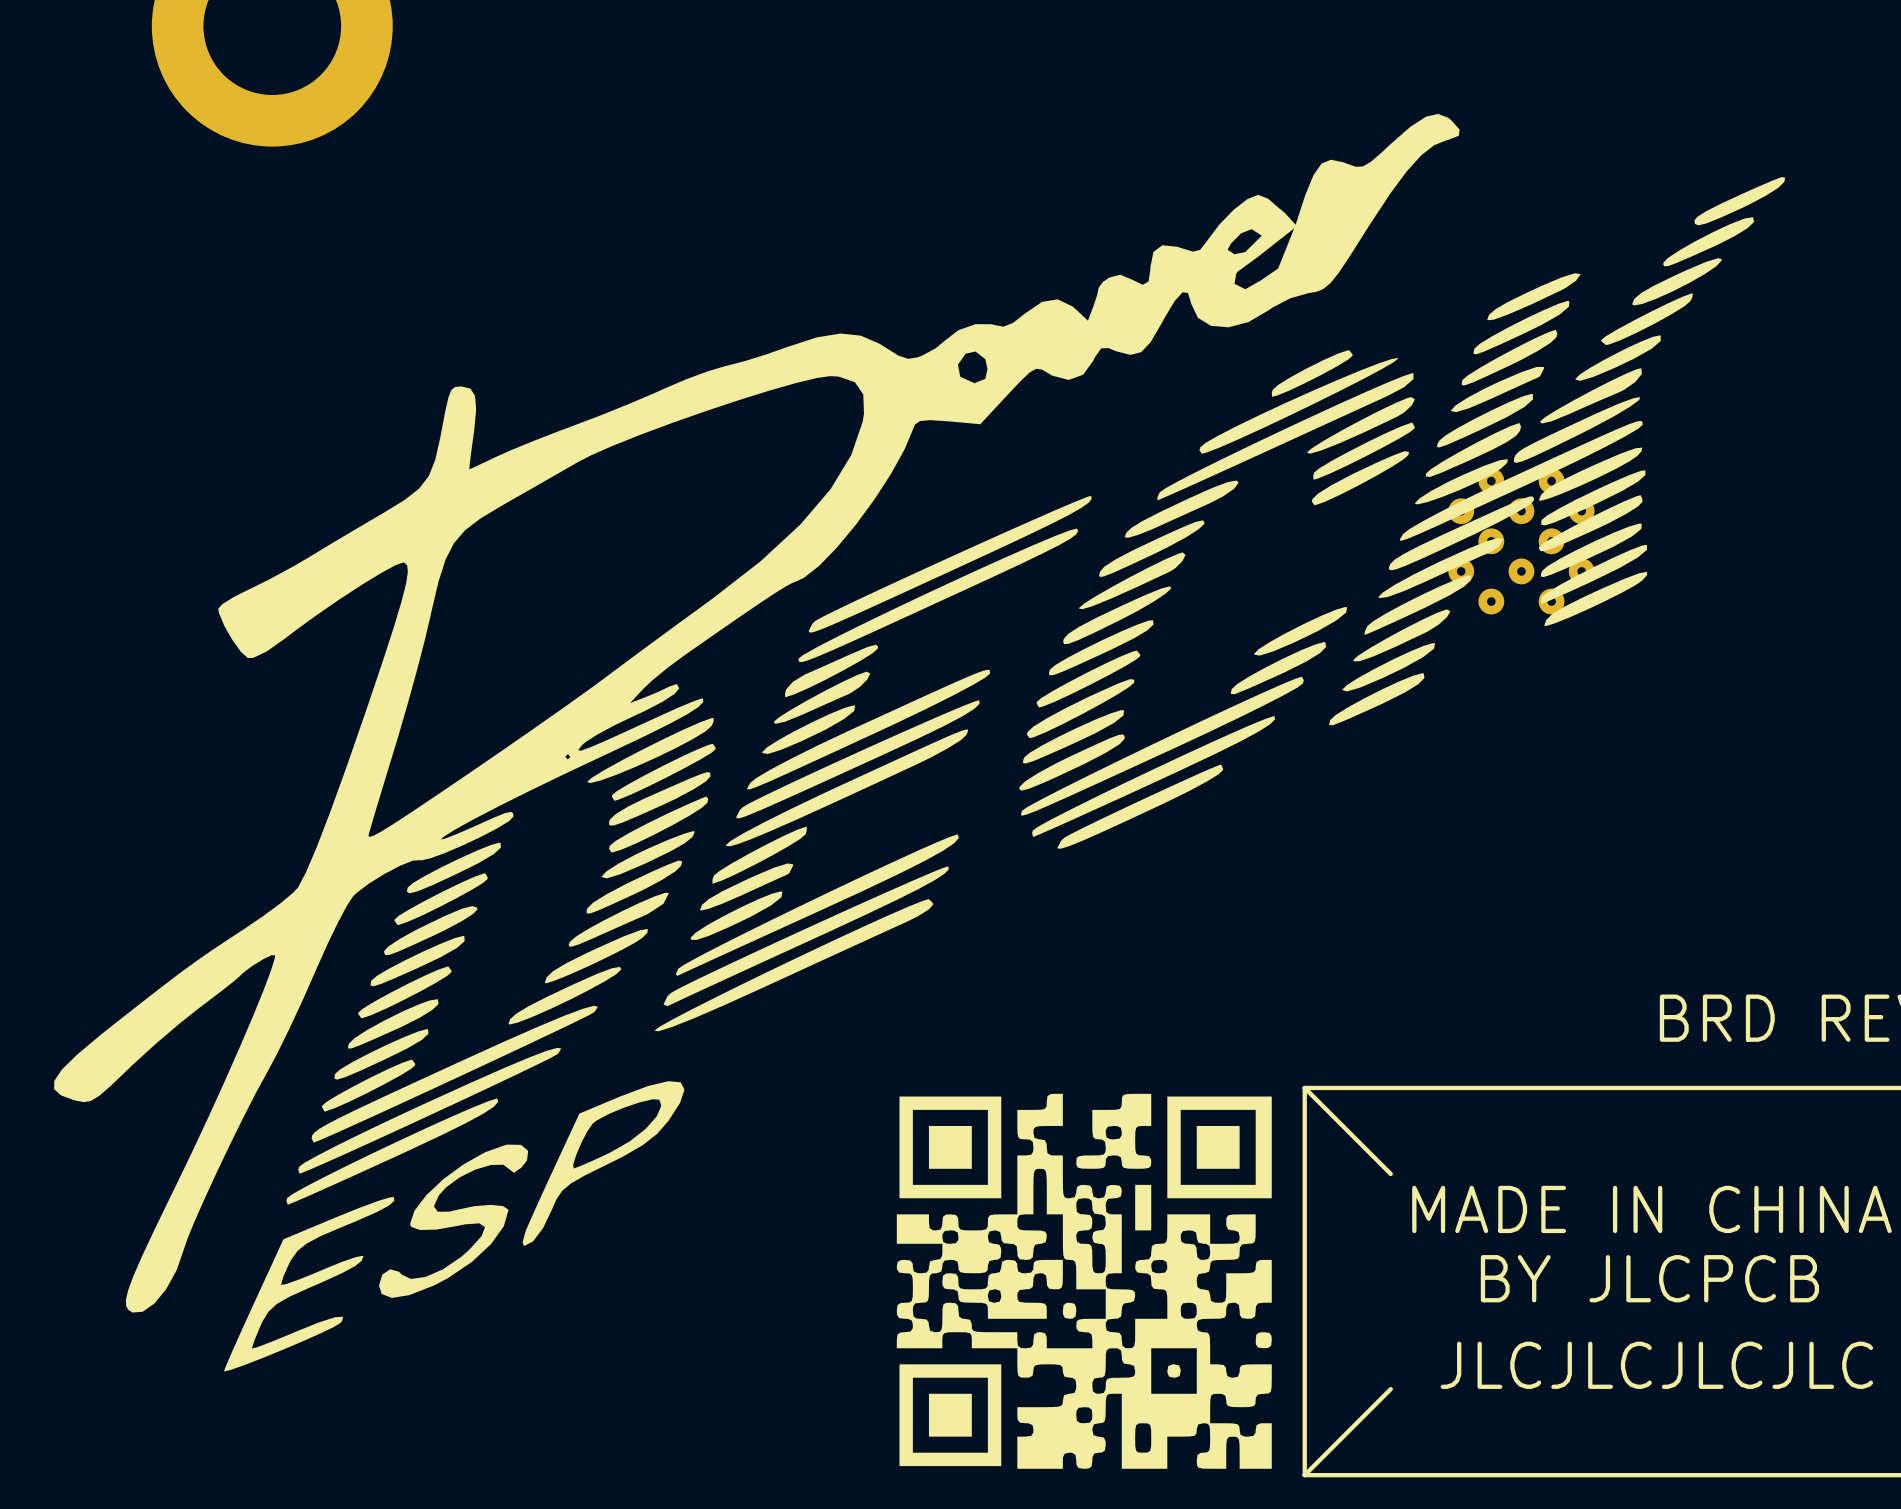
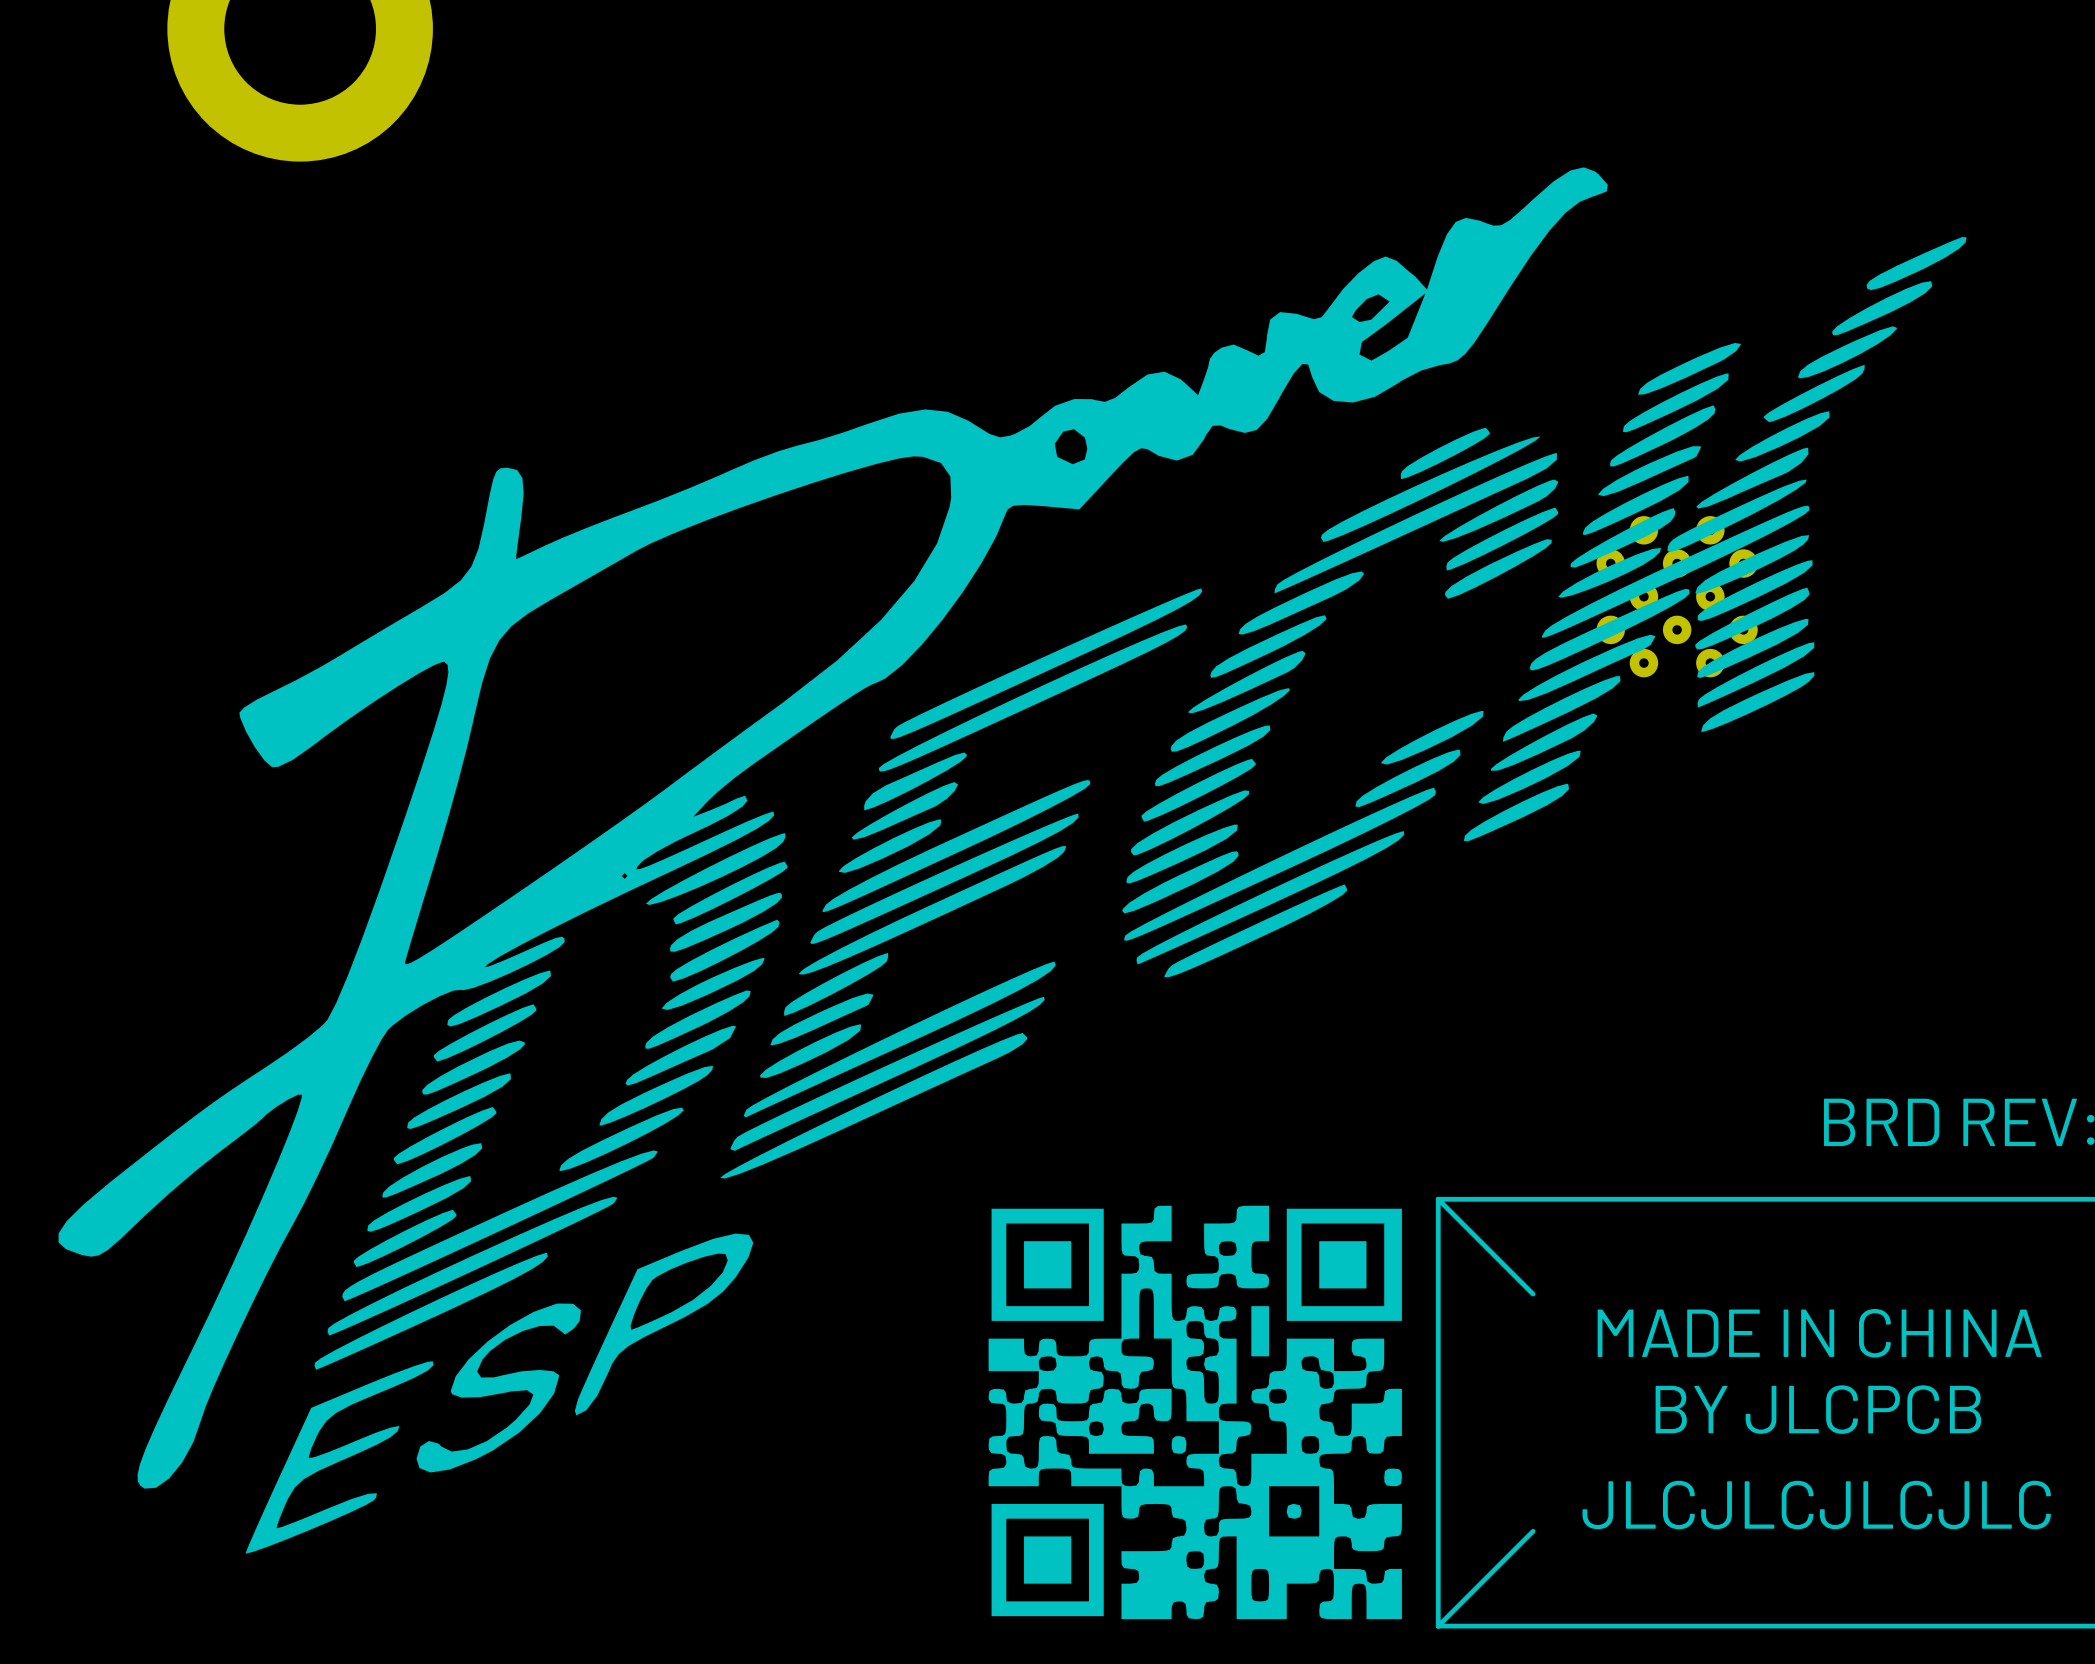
drawing position: (919, 742) -> (1012, 860)

